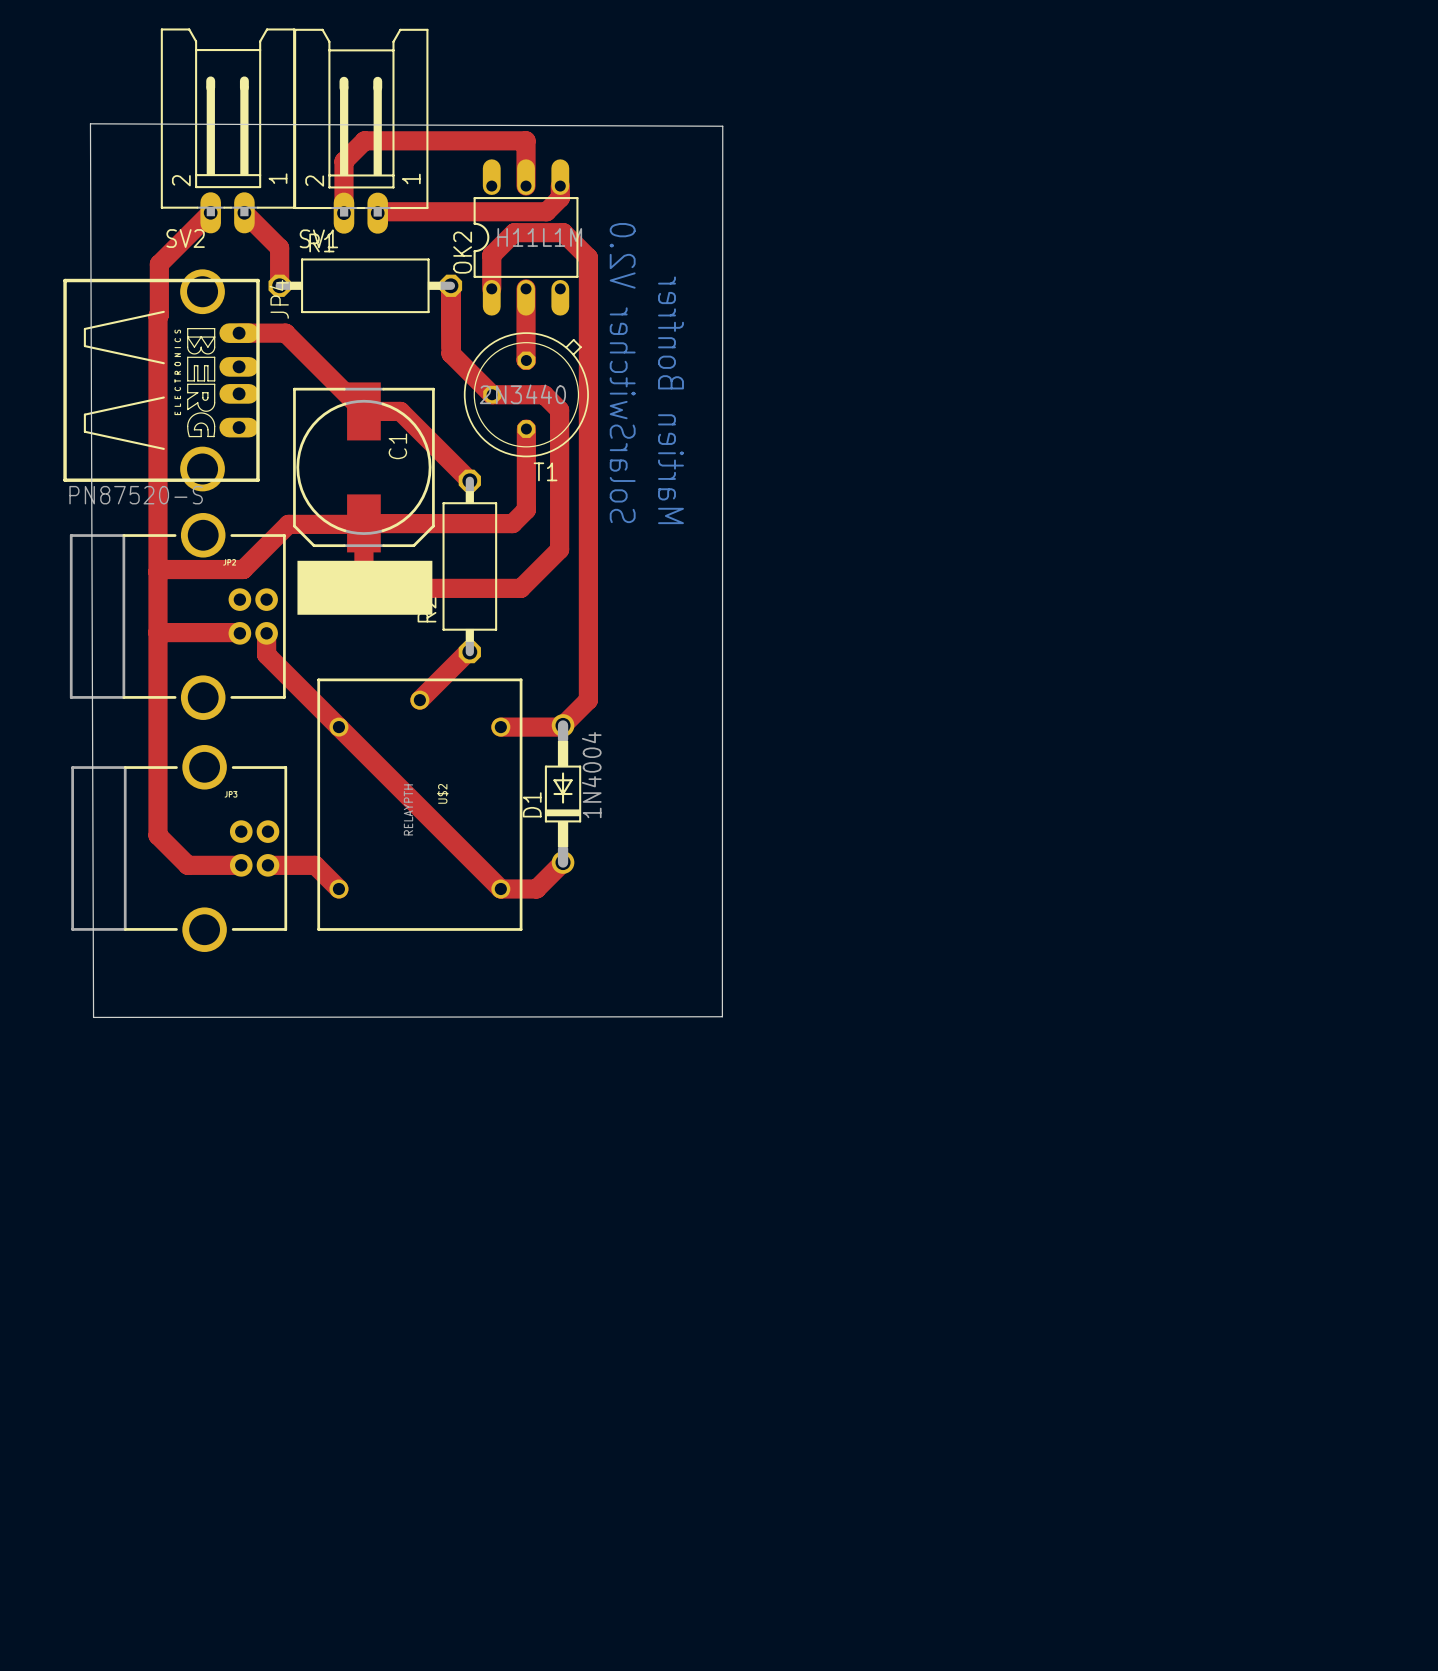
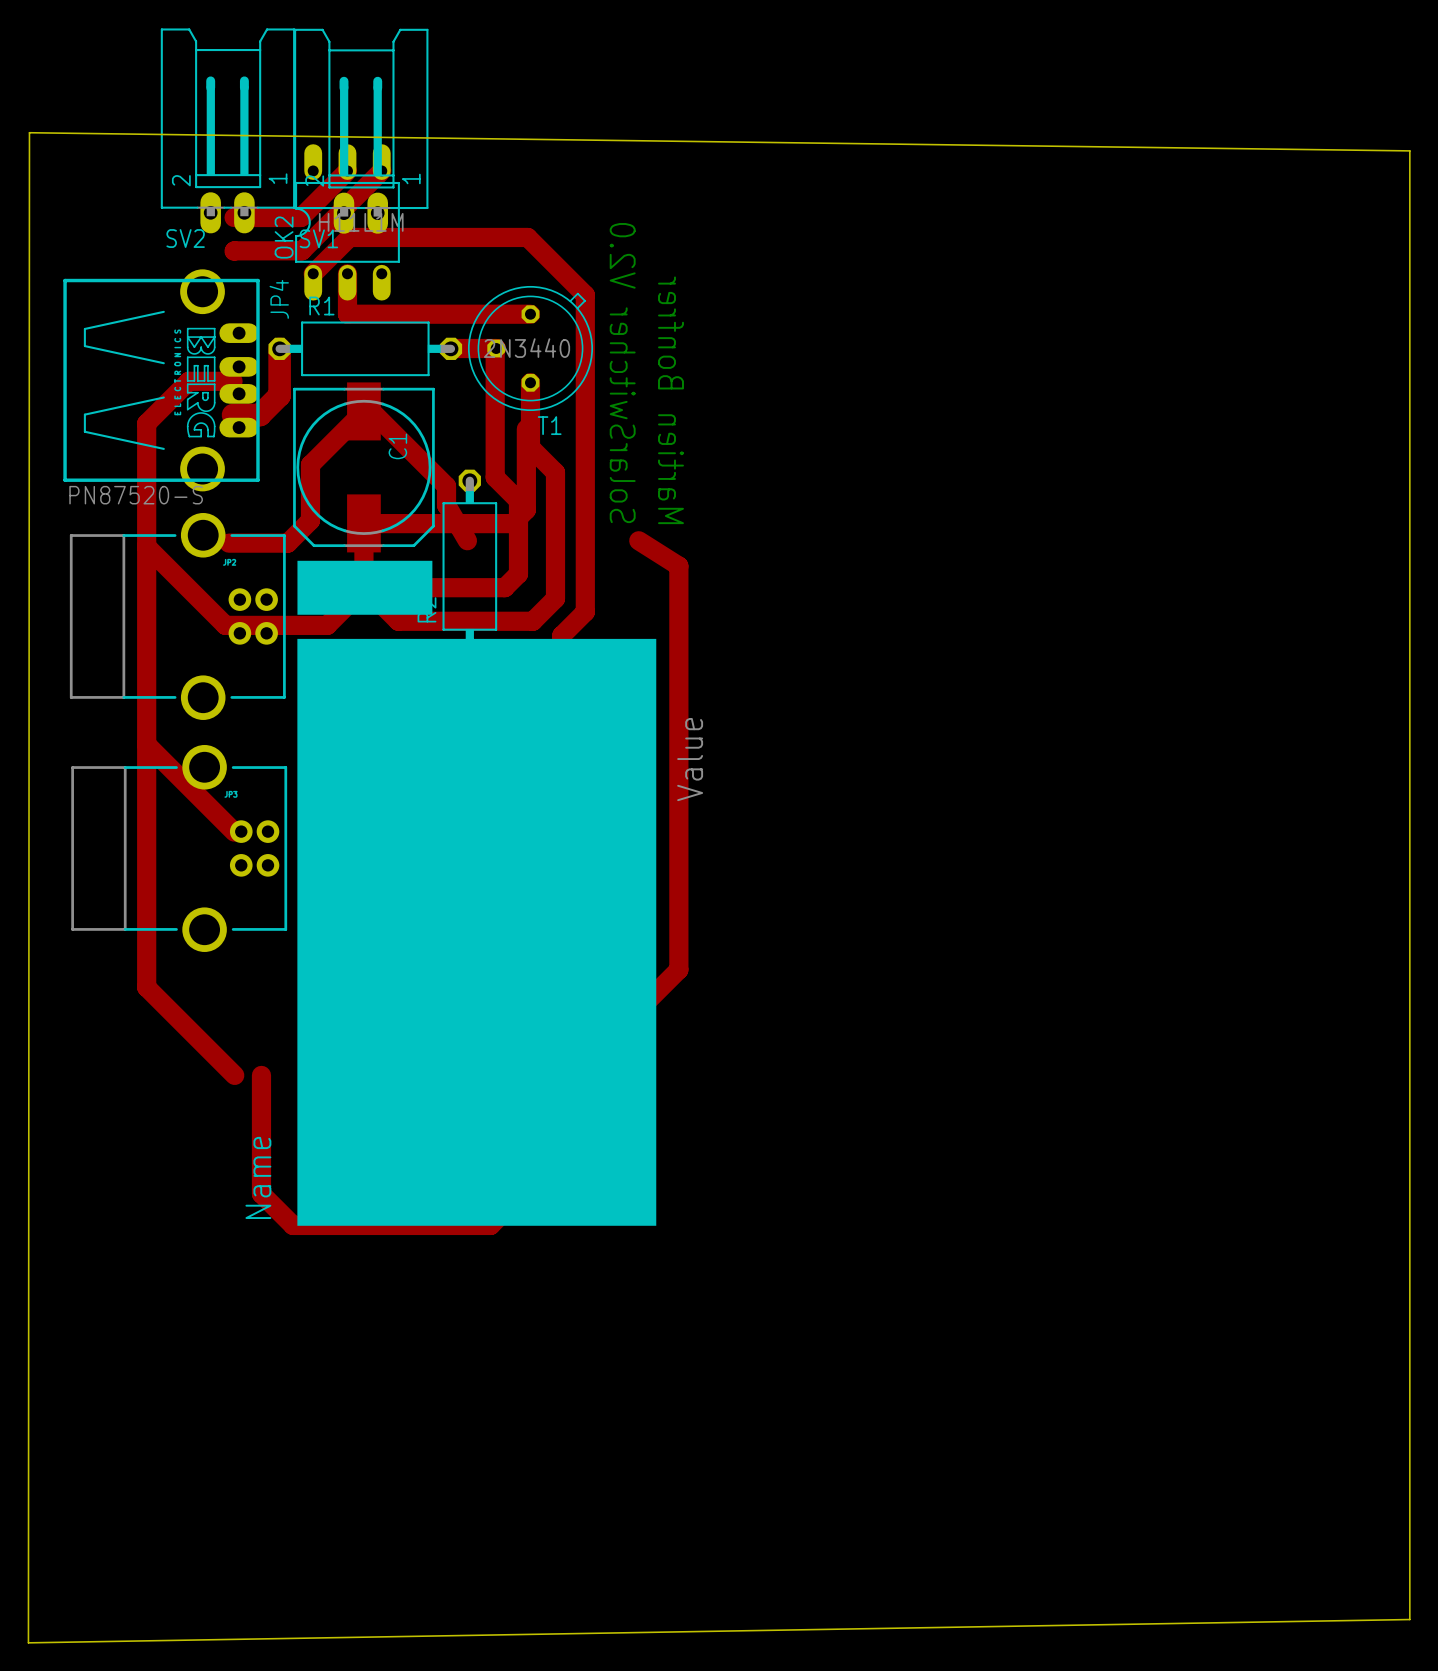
board edge: (90, 123) (722, 126) (722, 1016) (93, 1017) (90, 123) -> none
board edge: none -> (29, 132) (1409, 150) (1409, 1619) (28, 1642) (29, 132)
top track: none -> (347, 170) (300, 217) (234, 217)
top track: none -> (381, 170) (301, 250) (234, 251)
top track: (526, 186) (526, 140) (364, 140) (343, 161) (343, 213) -> none
top track: (560, 186) (560, 198) (546, 211) (377, 213) -> none
top track: (210, 212) (159, 264) (157, 835) (187, 865) (241, 865) -> none
top track: (244, 212) (279, 248) (279, 285) -> none
OK2 position: (526, 237) -> (347, 222)
top track: none -> (313, 273) (349, 237) (527, 237) (585, 295) (585, 612) (561, 635) (561, 679)
top track: none -> (347, 273) (347, 314) (530, 314)
R1 position: (365, 285) -> (365, 348)
top track: (491, 288) (491, 255) (514, 232) (563, 232) (588, 257) (588, 700) (561, 727) (500, 727) -> none
top track: (526, 288) (526, 360) -> none
top track: (239, 333) (285, 333) (363, 411) -> (228, 543) (287, 543) (310, 520) (310, 464) (363, 411)
top track: none -> (279, 348) (279, 395) (260, 415) (233, 415)
top track: (451, 348) (450, 285) (450, 353) (492, 394) (544, 394) (559, 410) (559, 549) (520, 588) (405, 587) -> (450, 348) (496, 348) (495, 477) (518, 500) (518, 573) (504, 587) (405, 587)
top track: none -> (233, 381) (188, 381) (146, 423) (146, 987) (234, 1075)
top track: none -> (530, 382) (530, 447) (555, 472) (555, 598) (532, 621) (398, 621) (364, 587) (327, 625) (225, 625) (146, 546)
T1 position: (526, 394) -> (530, 348)
top track: (371, 411) (400, 411) (469, 480) -> (371, 411) (446, 486) (446, 505) (467, 540)
top track: (364, 524) (288, 524) (243, 569) (160, 569) (157, 571) -> none
top track: none -> (638, 540) (678, 566) (678, 969) (476, 1171)
top track: (157, 632) (239, 633) -> none
top track: (266, 633) (266, 654) (500, 889) (536, 889) (563, 862) -> none
top track: (469, 652) (419, 700) -> none
top track: none -> (146, 744) (234, 832)
D1: 1N4004 (563, 793) -> none
top track: (267, 865) (315, 865) (338, 889) -> none
part: none -> (476, 932)
top track: none -> (261, 1075) (261, 1193) (293, 1225) (490, 1225) (544, 1171)

